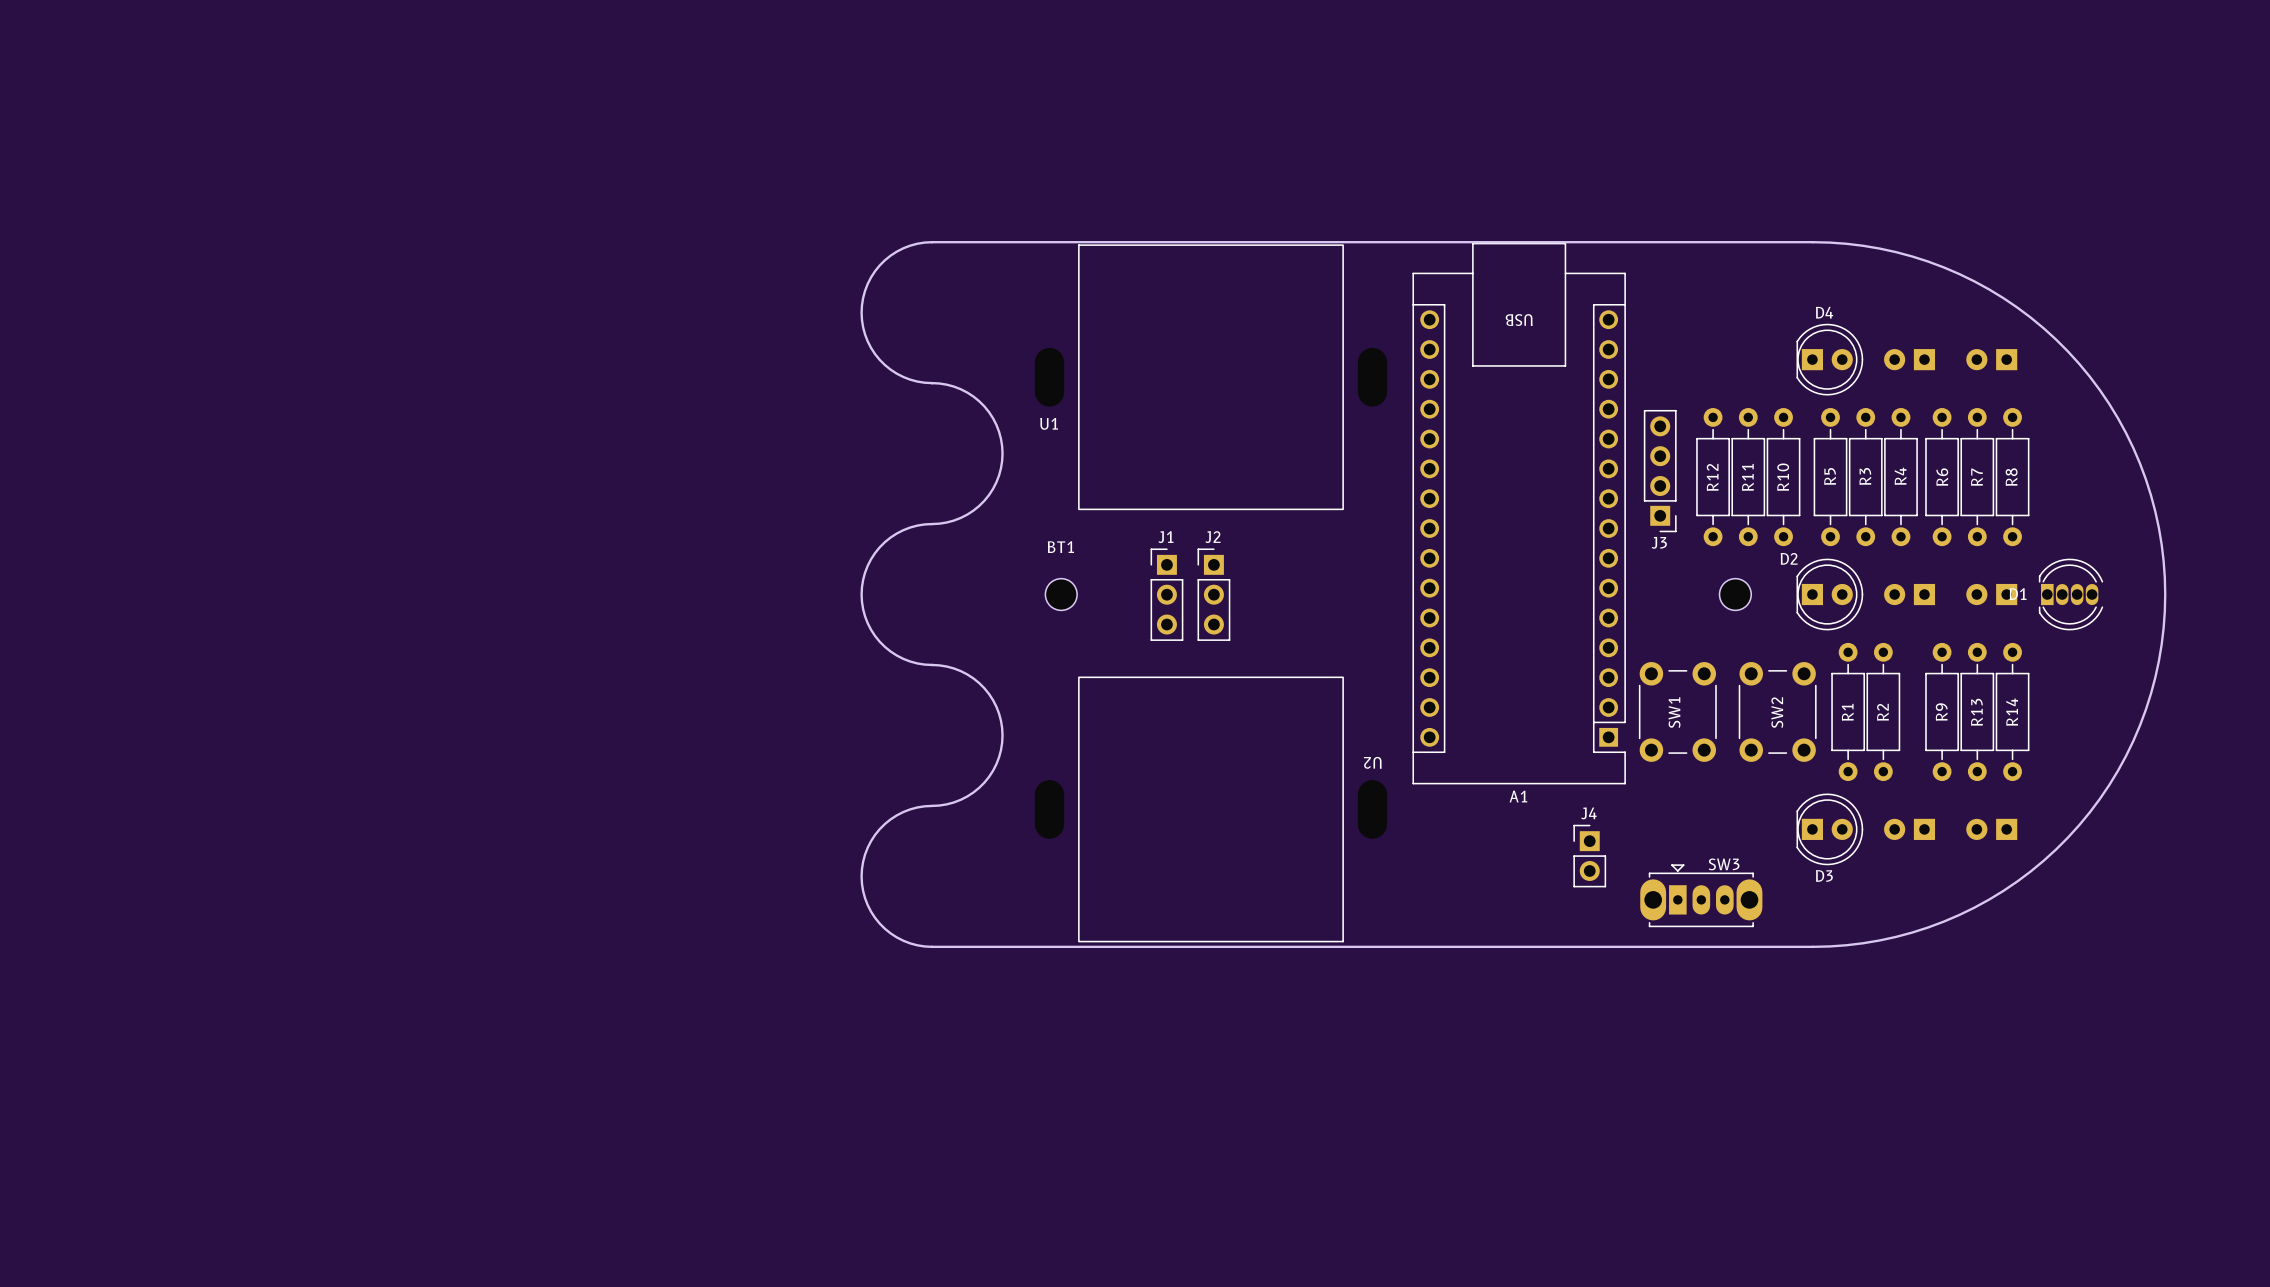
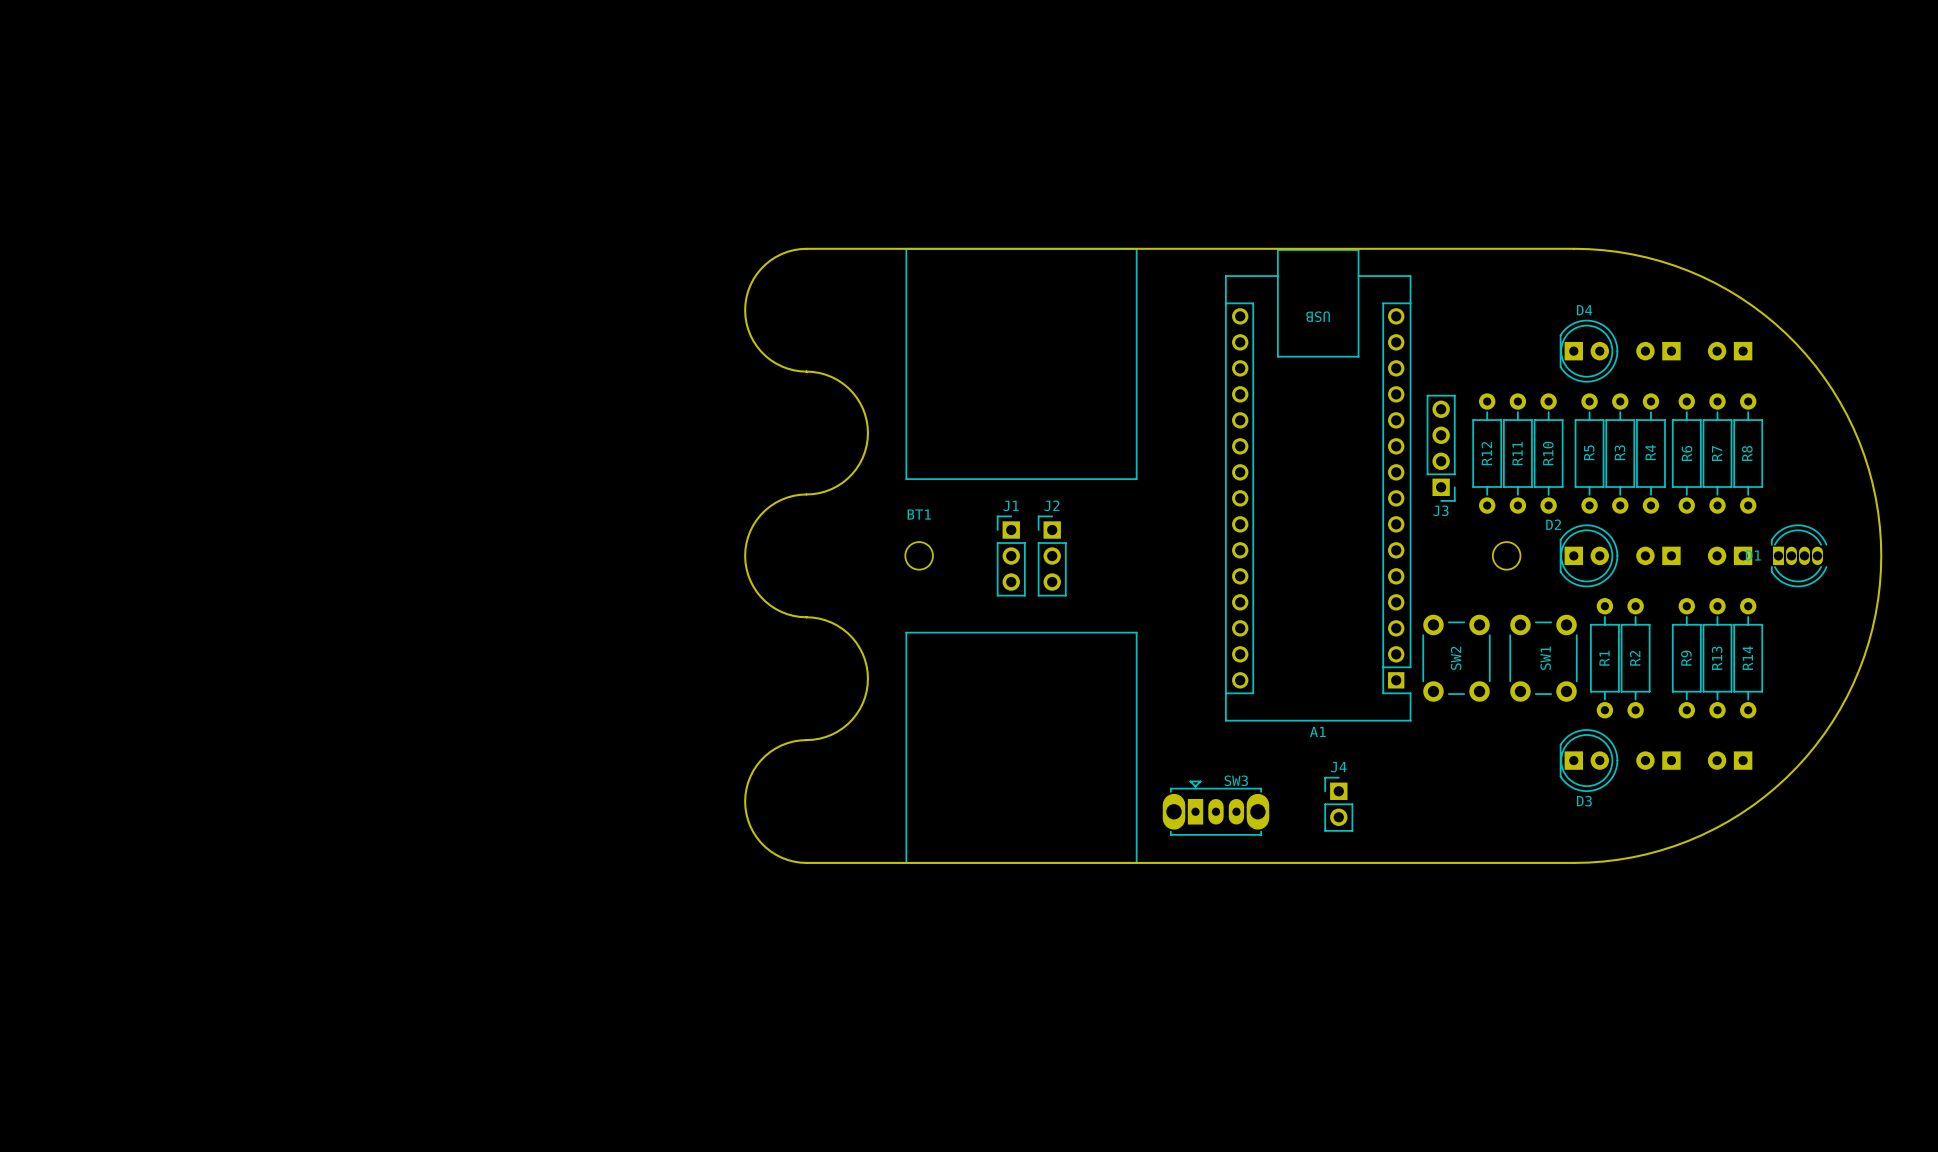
line: none -> (906, 248) (1136, 248) (1136, 479) (906, 479) (906, 248)
U1: (1210, 377) -> none
line: none -> (906, 632) (906, 862) (1136, 862) (1136, 632) (906, 632)
SW1 name: SW1 (1674, 712) -> SW2 (1456, 658)
SW2 name: SW2 (1777, 712) -> SW1 (1545, 658)
U2: (1210, 809) -> none
J4 position: (1589, 856) -> (1338, 804)
SW3 position: (1701, 895) -> (1215, 808)

